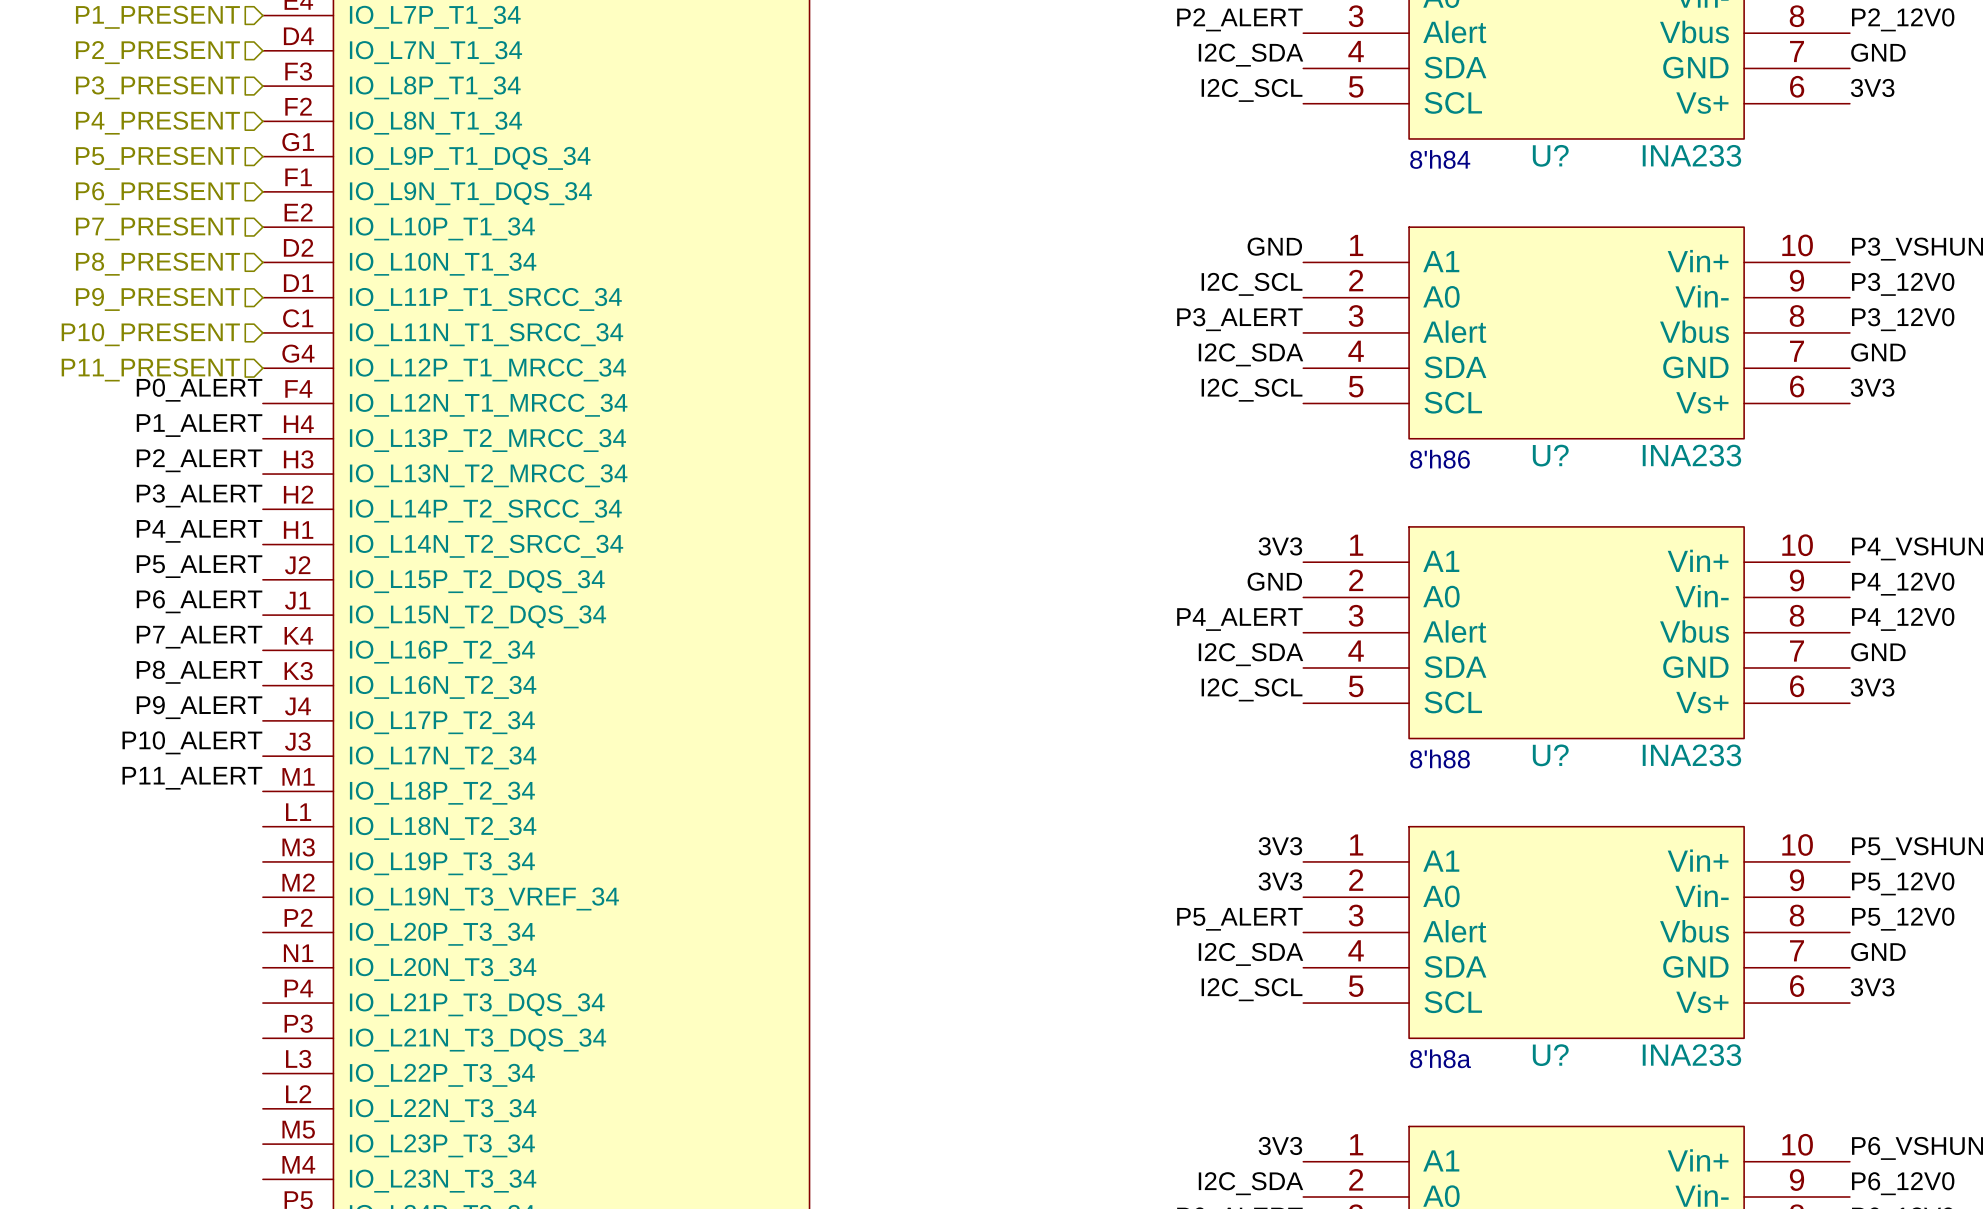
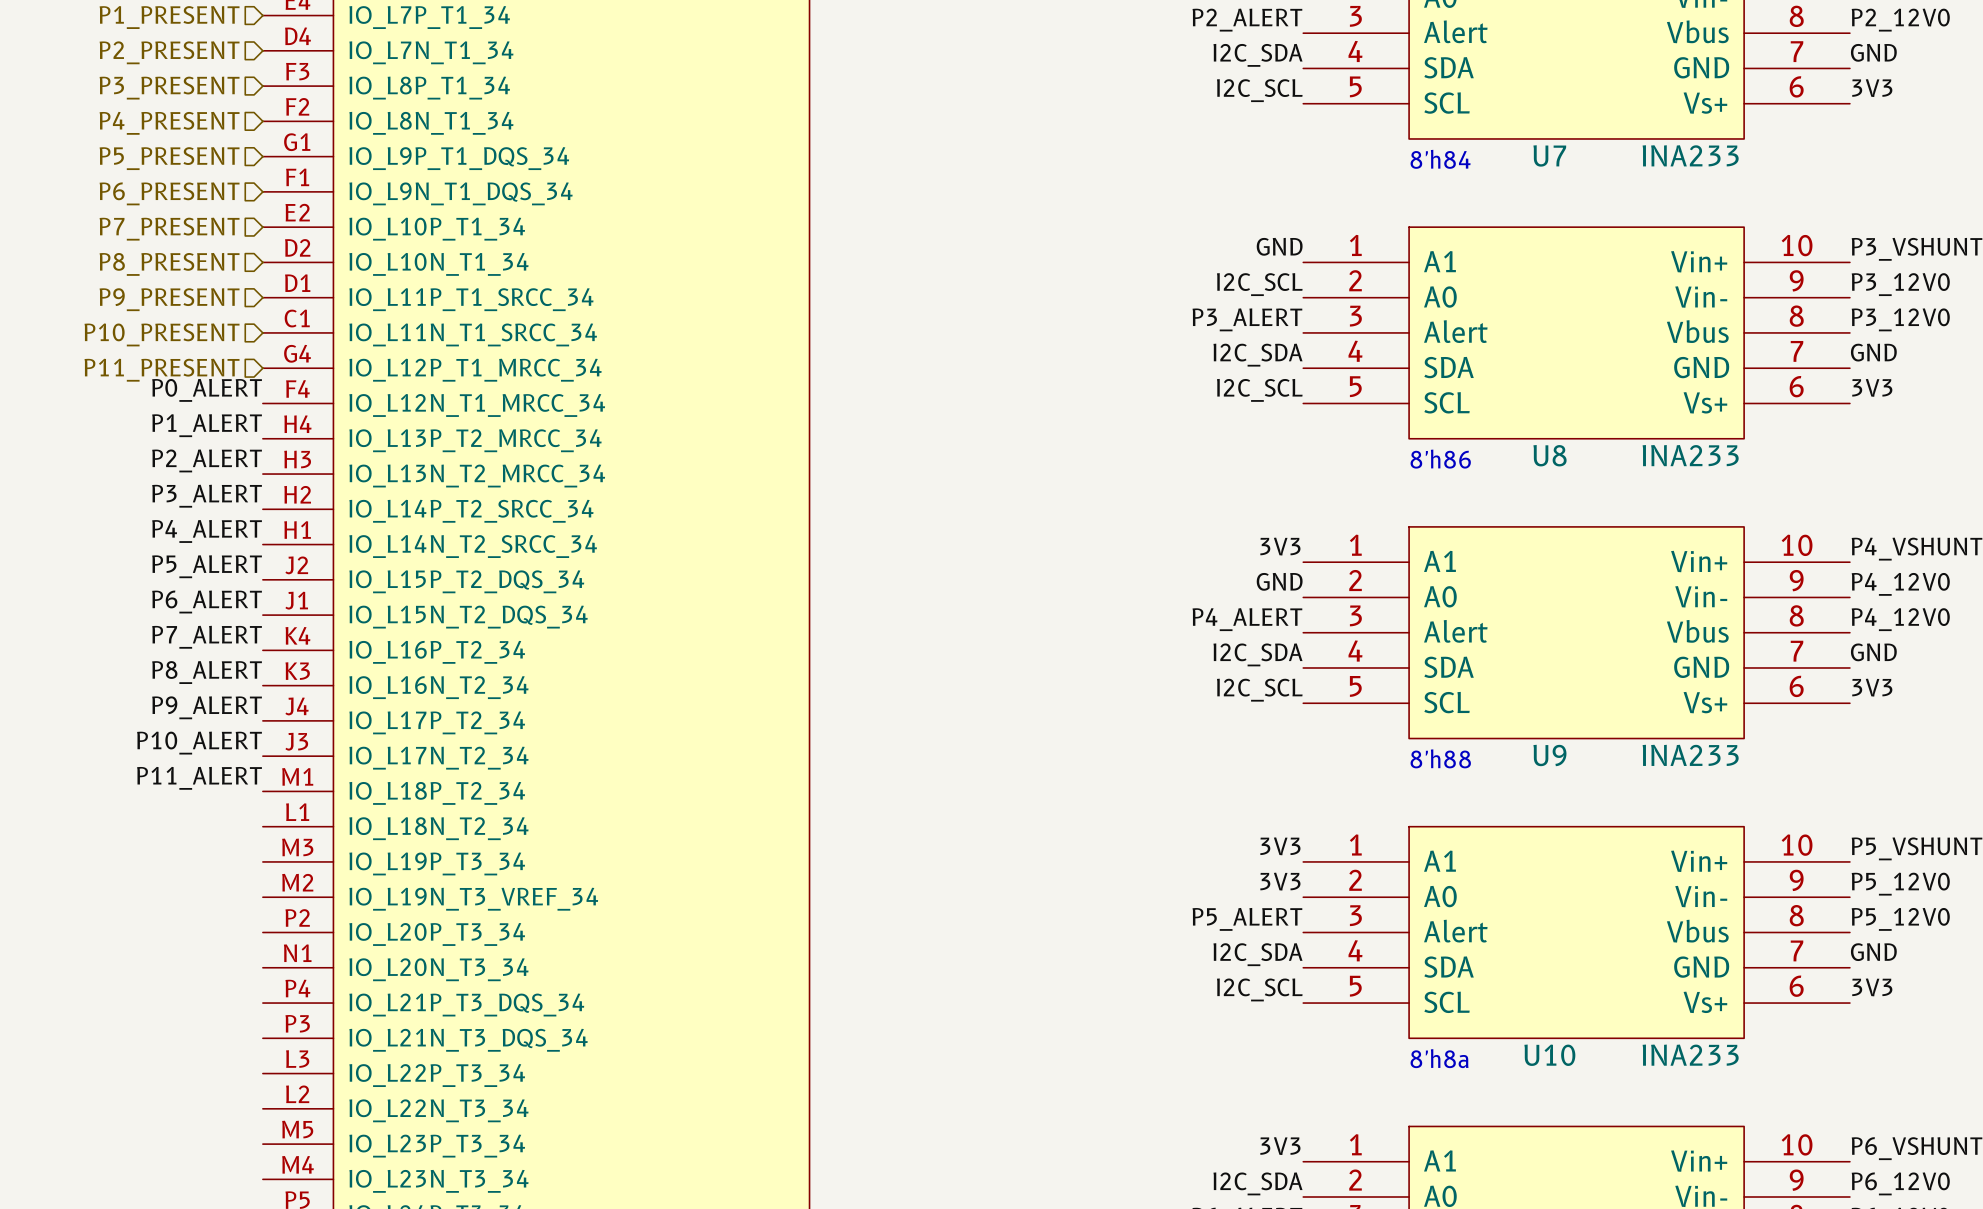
U? name: U? (1550, 155) -> U7 (1549, 155)
U? name: U? (1550, 455) -> U8 (1550, 455)
U? name: U? (1550, 755) -> U9 (1549, 755)
U? name: U? (1550, 1055) -> U10 (1549, 1055)

